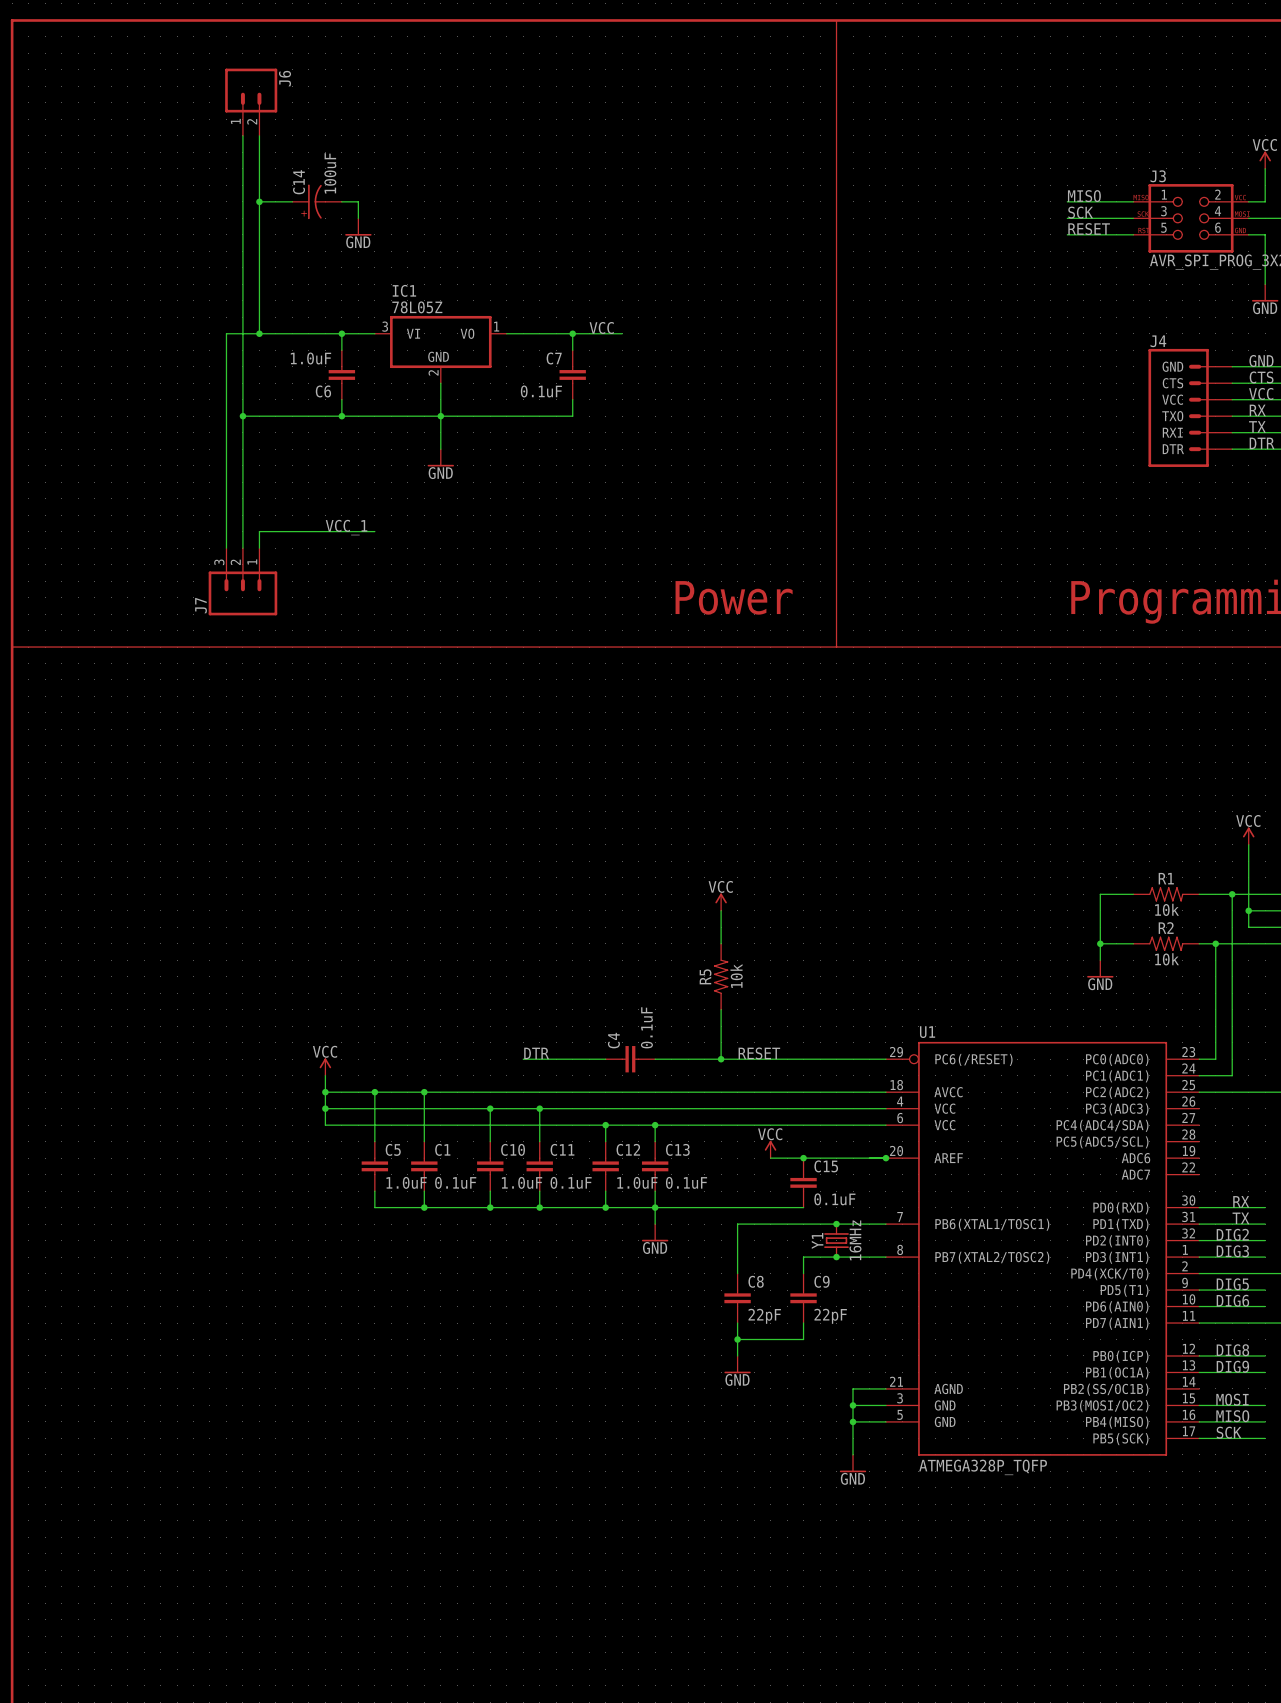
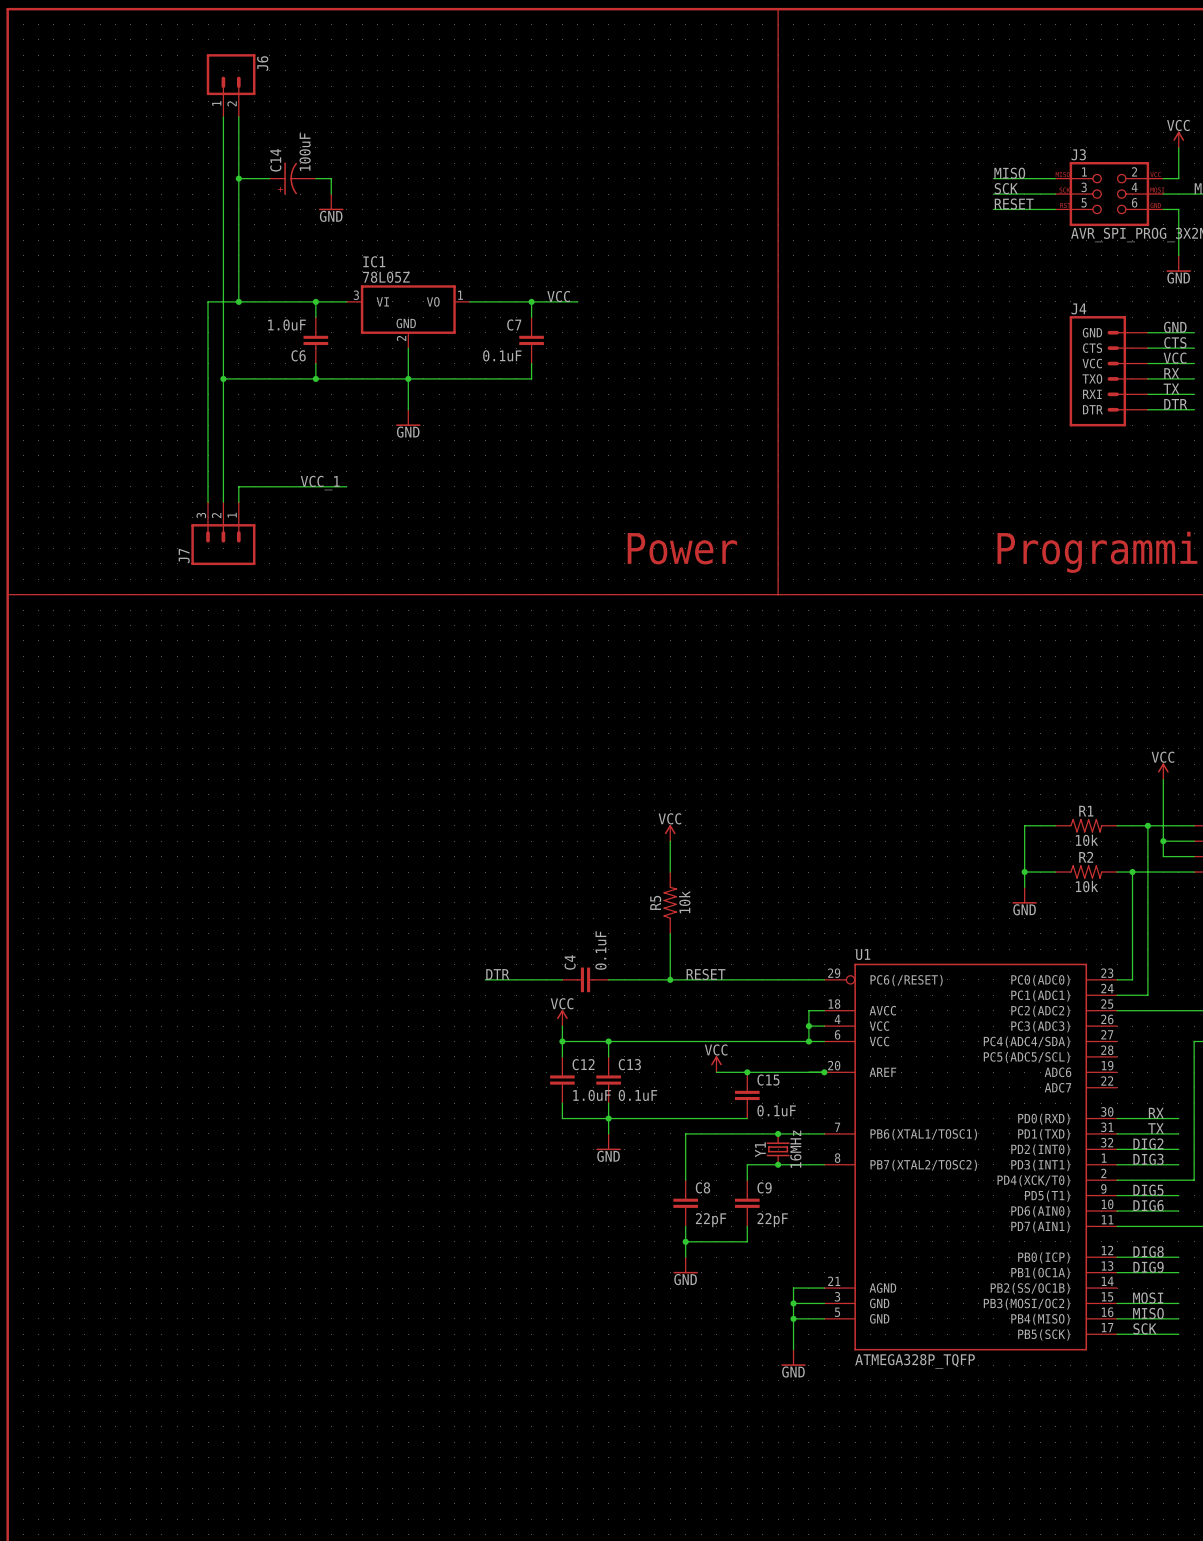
power symbol: VCC (325, 1067) -> none
wire: (325, 1075) (325, 1125) (605, 1125) -> (562, 1026) (562, 1041)
wire: (325, 1092) (869, 1092) -> (808, 1041) (808, 1010)
junction: (325, 1092) -> none
wire: (374, 1092) (374, 1141) -> none
junction: (374, 1092) -> none
wire: (424, 1092) (424, 1141) -> none
junction: (424, 1092) -> none
power symbol: none -> VCC (562, 1018)
wire: (325, 1108) (869, 1108) -> none
junction: (325, 1108) -> none
wire: (490, 1108) (490, 1141) -> none
junction: (490, 1108) -> none
wire: (539, 1108) (539, 1141) -> none
junction: (539, 1108) -> none
junction: none -> (808, 1026)
junction: none -> (808, 1041)
C5: 1.0uF (374, 1166) -> none
C1: 0.1uF (424, 1166) -> none
C10: 1.0uF (490, 1166) -> none
C11: 0.1uF (539, 1166) -> none
wire: (374, 1191) (374, 1207) (605, 1207) -> none
wire: (424, 1191) (424, 1207) -> none
wire: (490, 1191) (490, 1207) -> none
wire: (539, 1191) (539, 1207) -> none
junction: (424, 1207) -> none
junction: (490, 1207) -> none
junction: (539, 1207) -> none
junction: (605, 1207) -> none

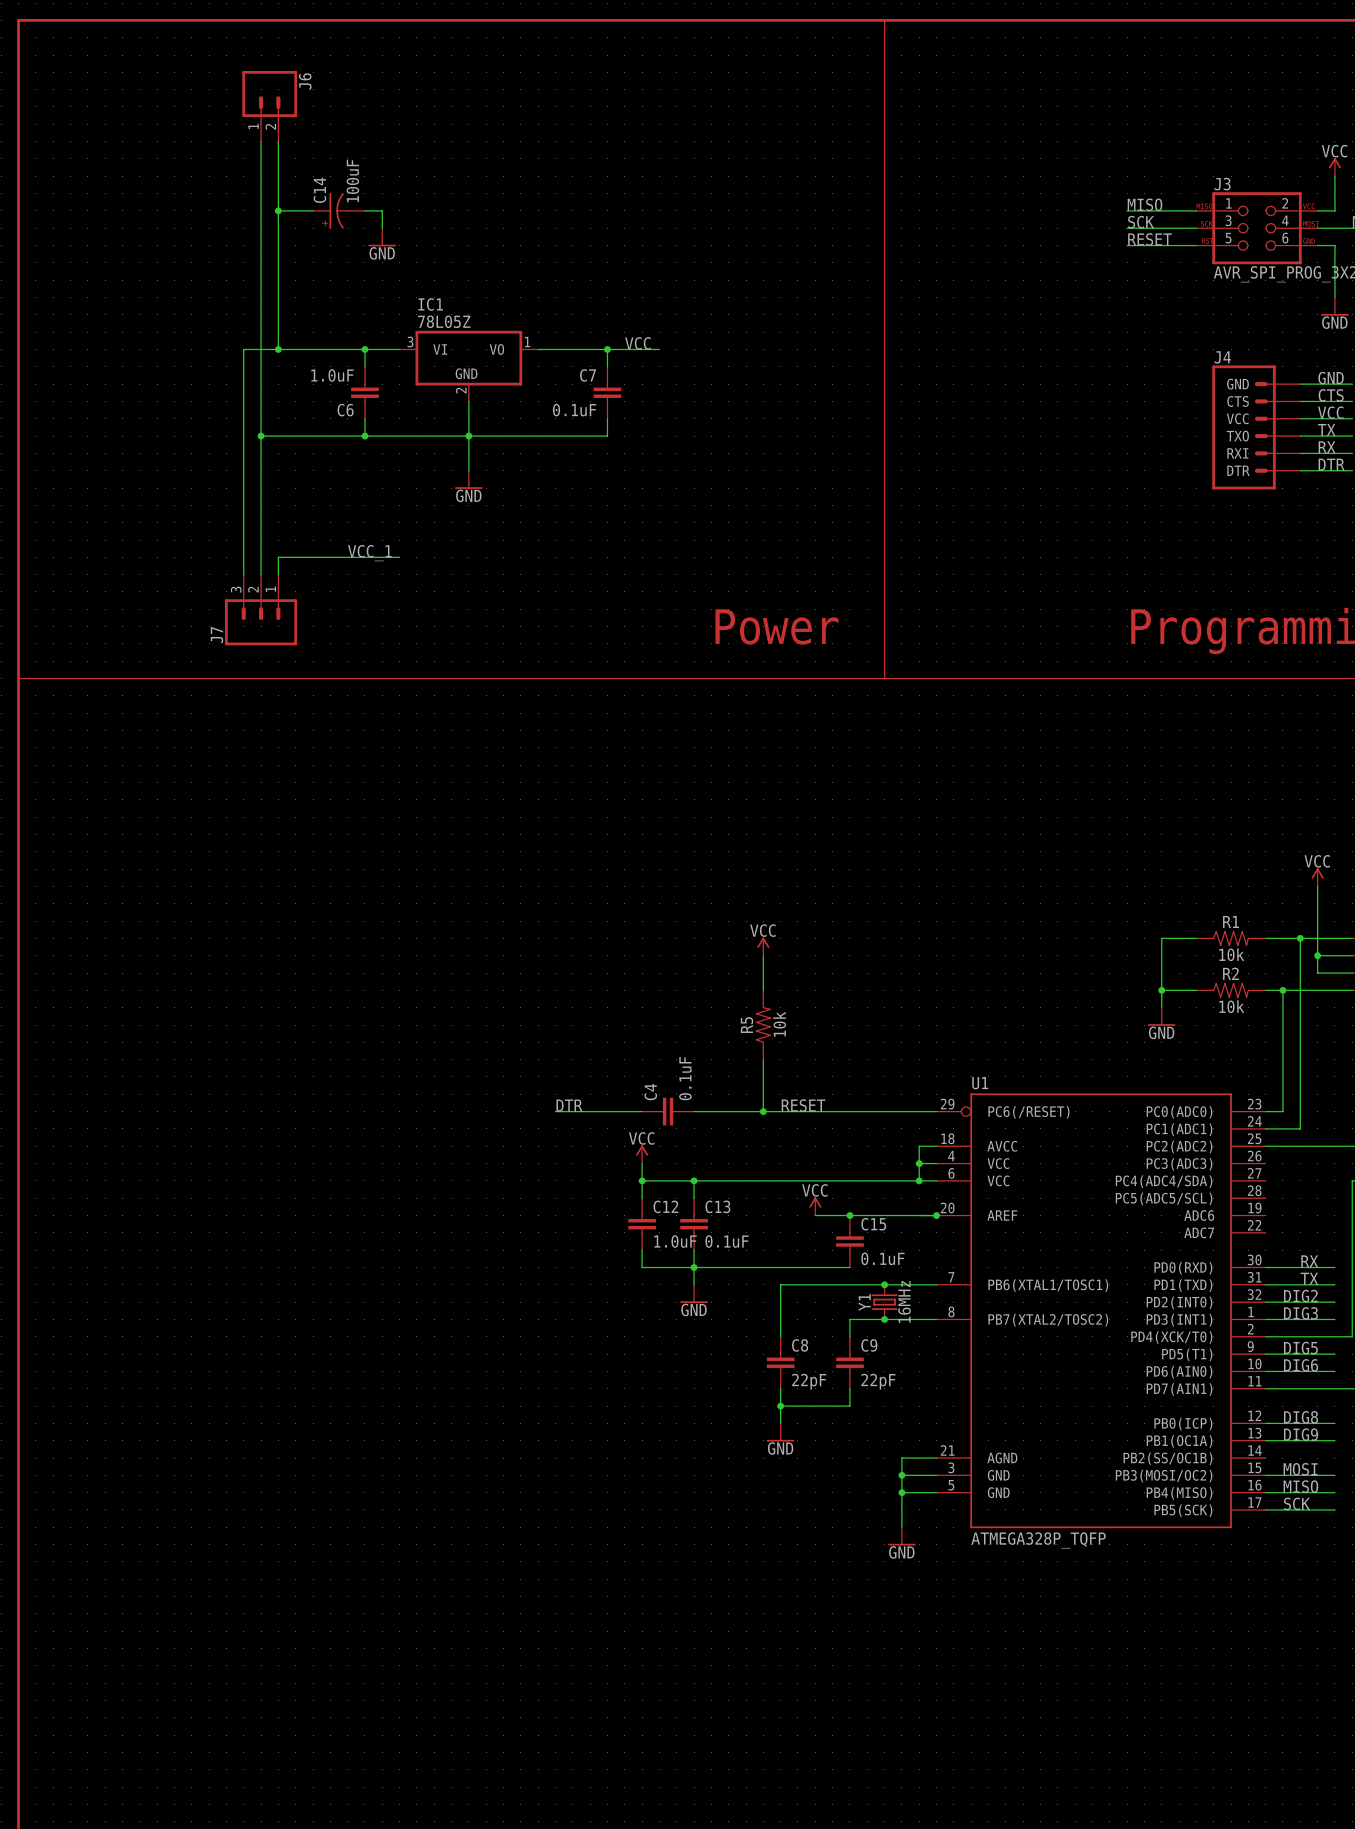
label: RX (1171, 373) -> TX (1326, 430)
label: TX (1171, 388) -> RX (1327, 447)

